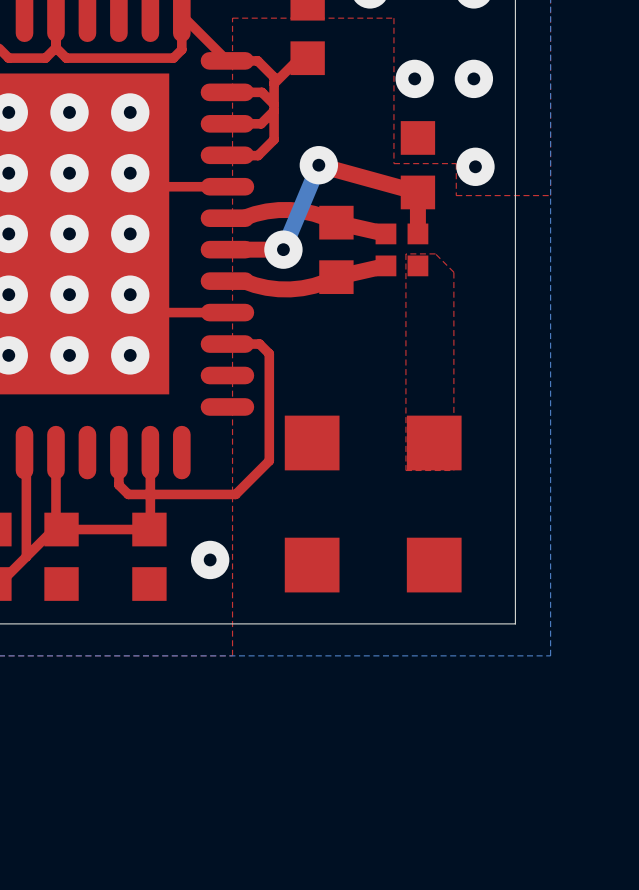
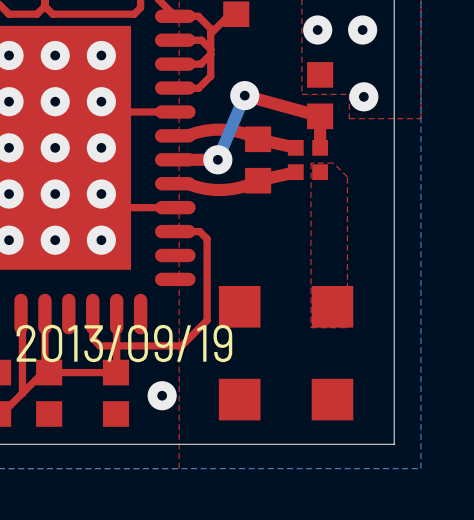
text: none -> 2013/09/19 (124, 343)

